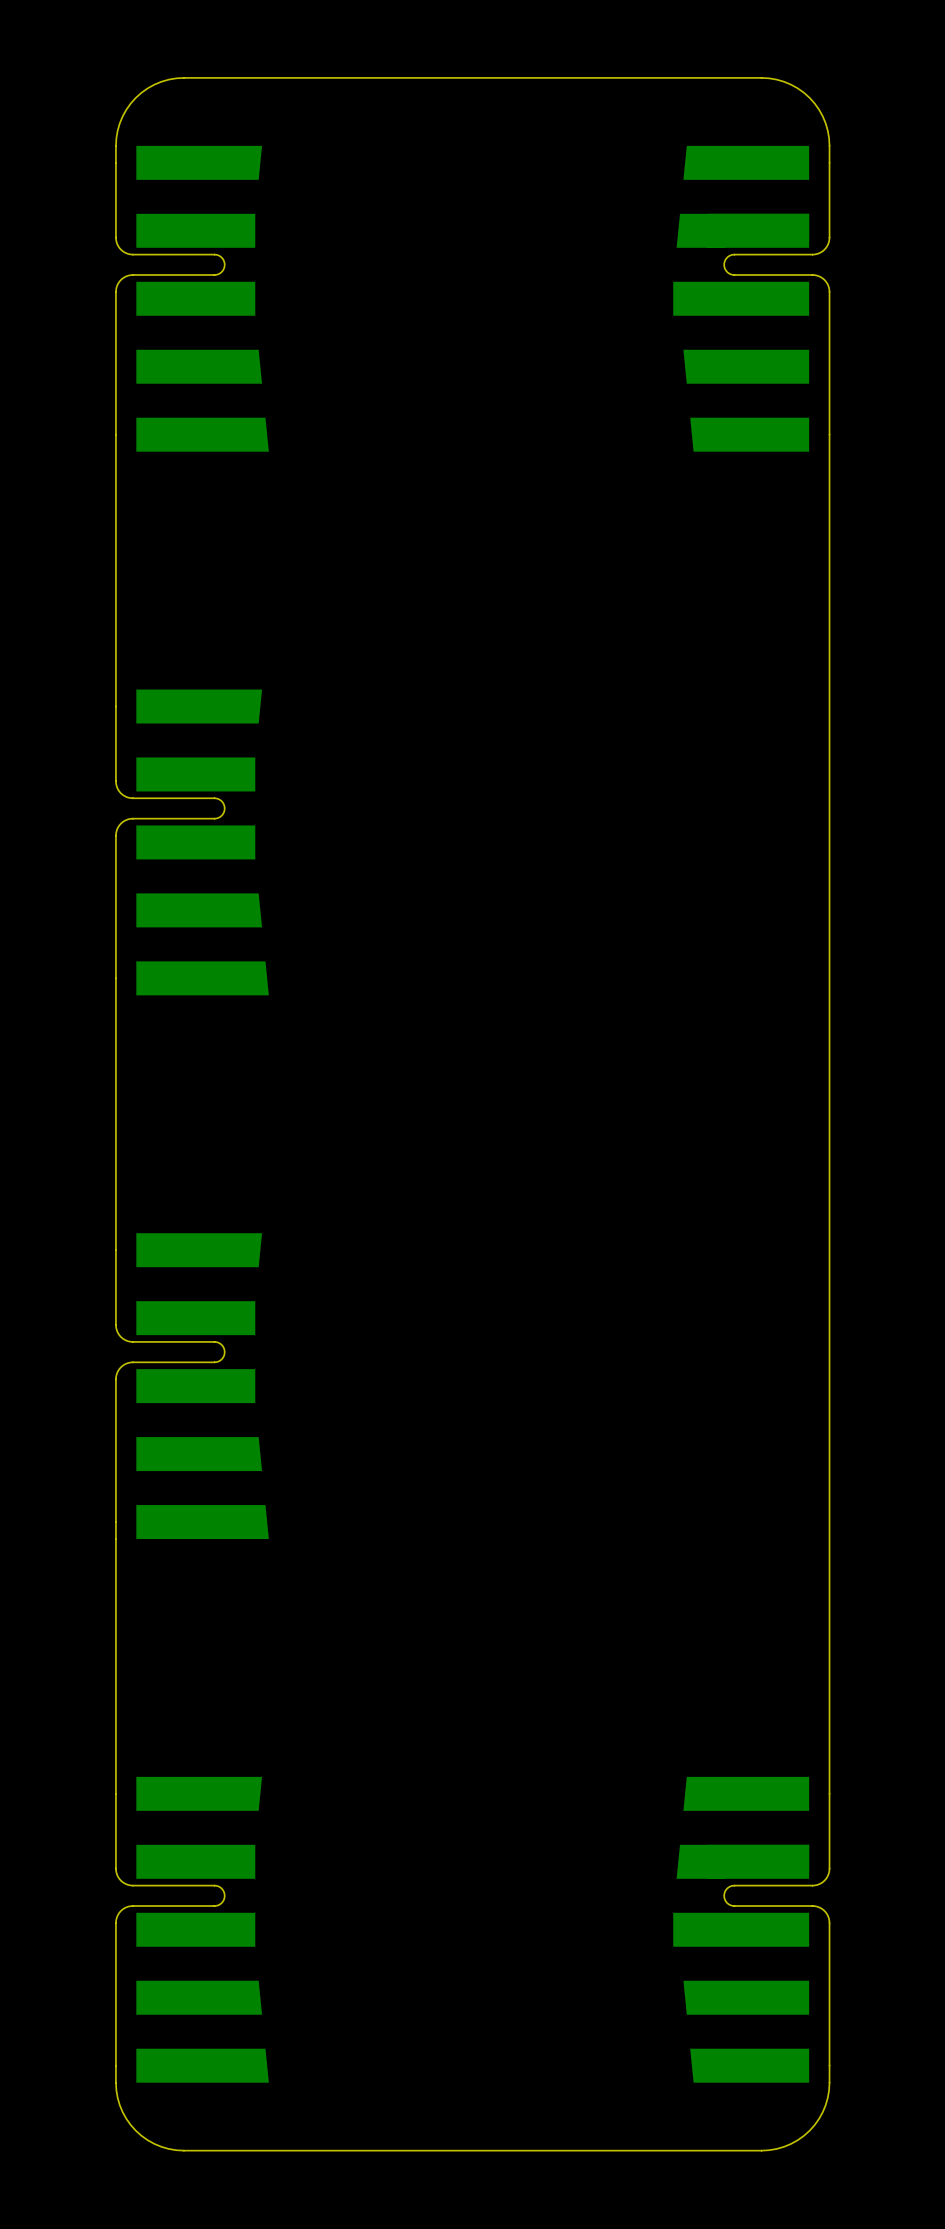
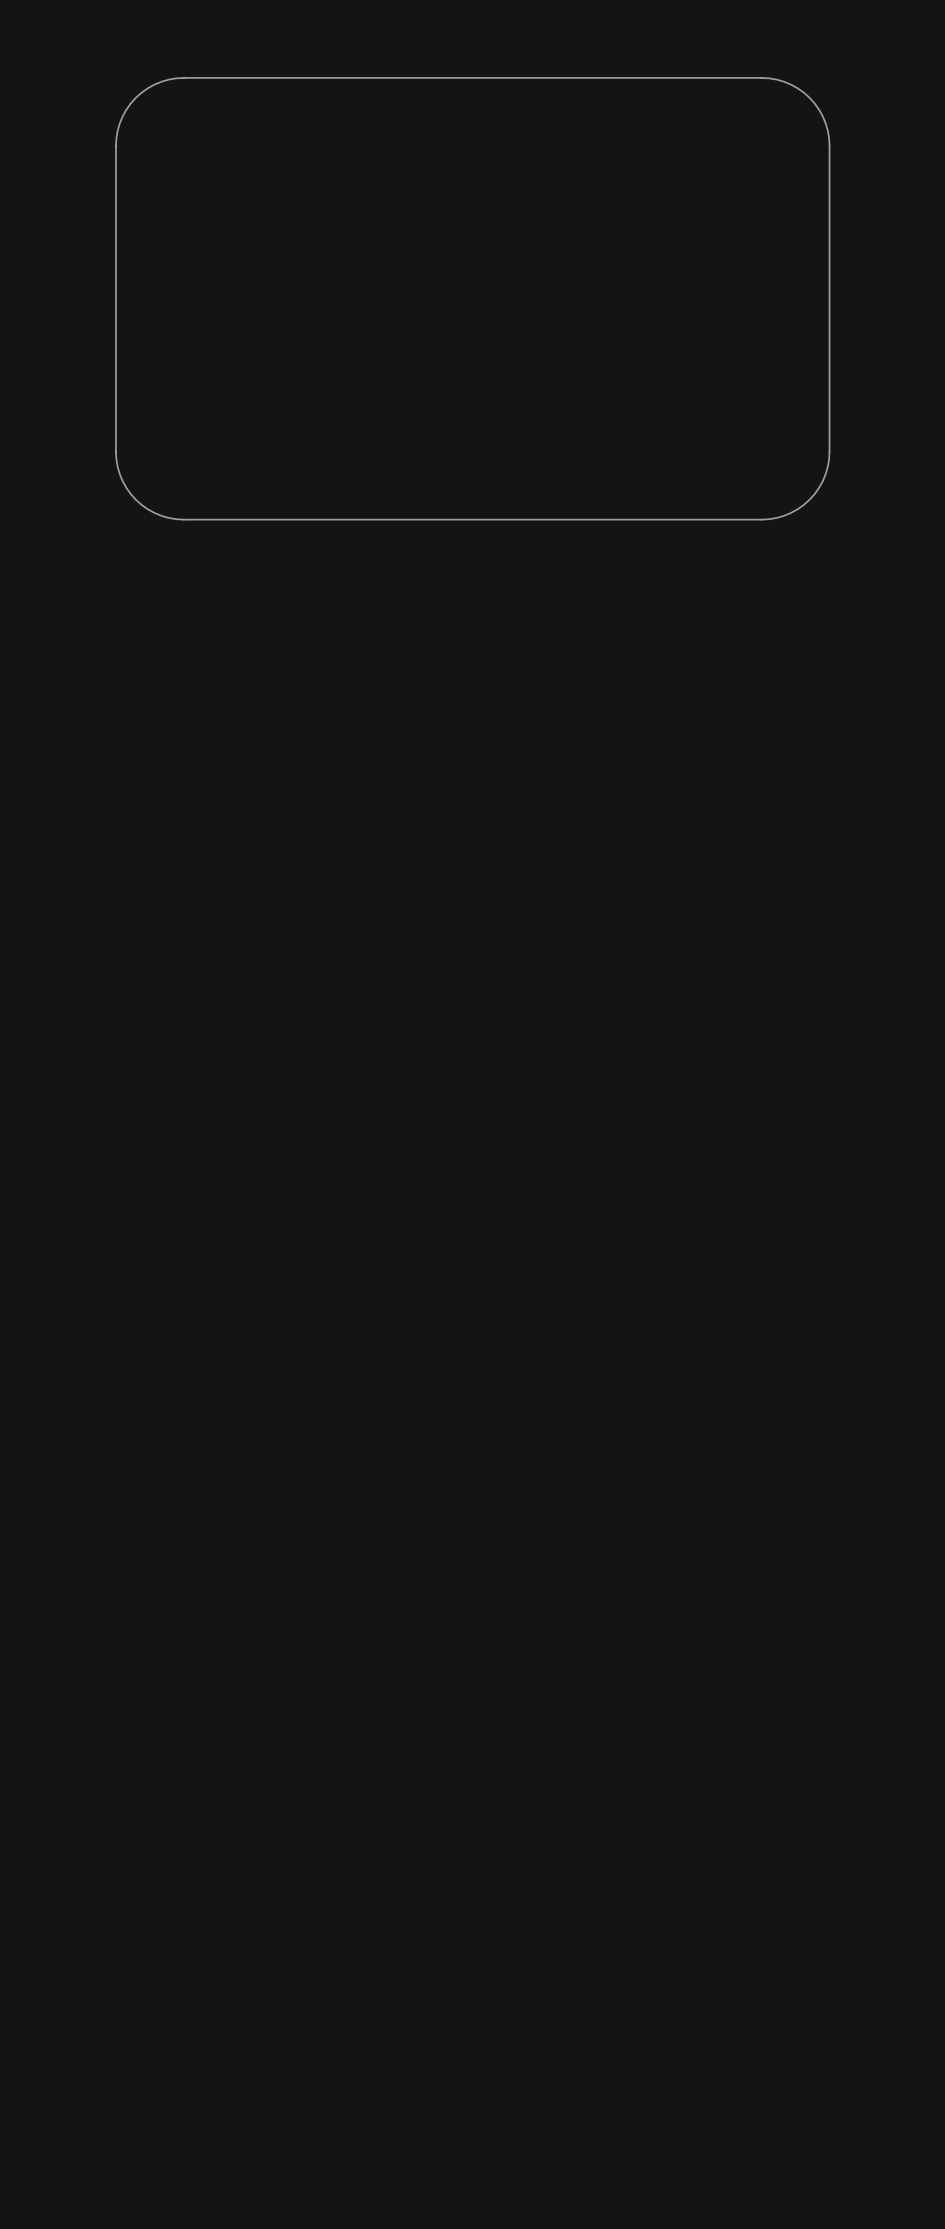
board edge: none -> (829, 162) (829, 434)
part: (191, 298) -> none
part: (751, 298) -> none
board edge: (115, 451) (115, 706) -> (115, 451) (119, 474) (126, 487) (135, 499) (147, 509) (161, 515) (183, 519) (769, 519) (791, 512) (809, 499) (822, 481) (827, 466) (829, 451)
board edge: (829, 451) (829, 1793) -> none
part: (191, 842) -> none
board edge: (115, 978) (115, 1250) -> (115, 162) (115, 434)
part: (191, 1386) -> none
board edge: (115, 1522) (115, 1793) -> none
part: (191, 1929) -> none
part: (751, 1929) -> none
board edge: (829, 2065) (827, 2097) (822, 2112) (814, 2125) (803, 2135) (791, 2143) (776, 2148) (761, 2150) (176, 2150) (154, 2143) (141, 2135) (130, 2125) (122, 2112) (117, 2097) (115, 2065) -> none

